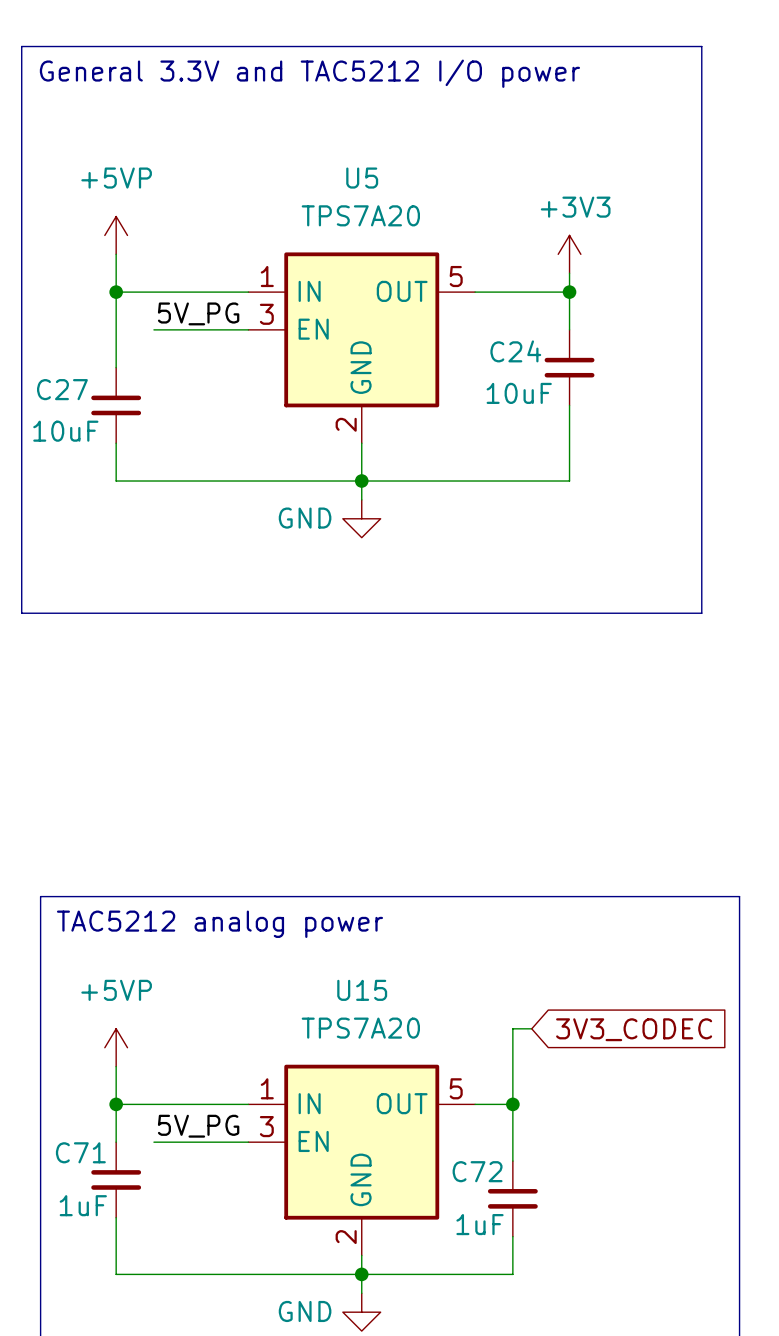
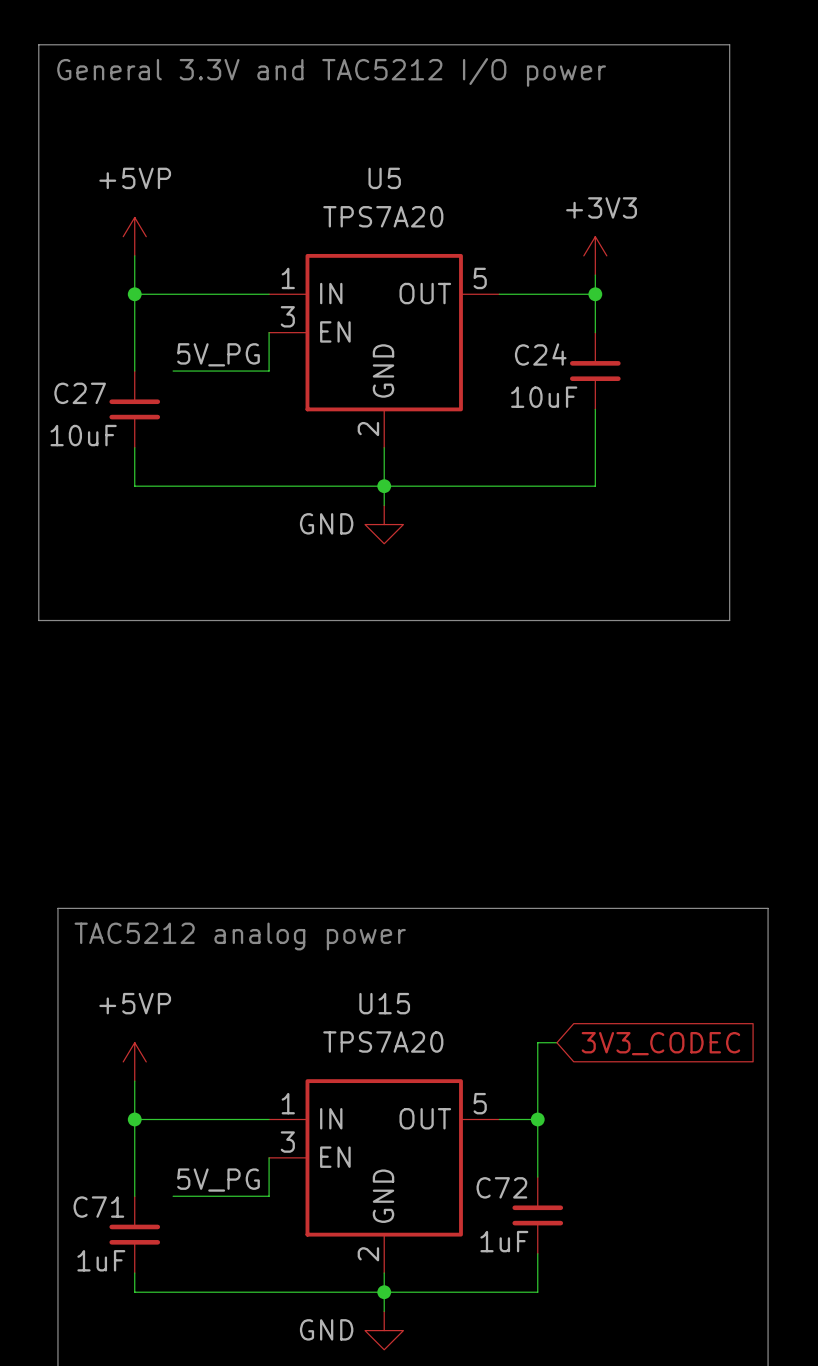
label position: 5V_PG (198, 313) -> 5V_PG (218, 354)
wire: (153, 329) (248, 329) -> (173, 371) (269, 371) (269, 332)
label position: 5V_PG (198, 1126) -> 5V_PG (218, 1180)
wire: (153, 1142) (248, 1142) -> (173, 1196) (269, 1196) (269, 1157)
C71 position: (116, 1179) -> (134, 1234)

